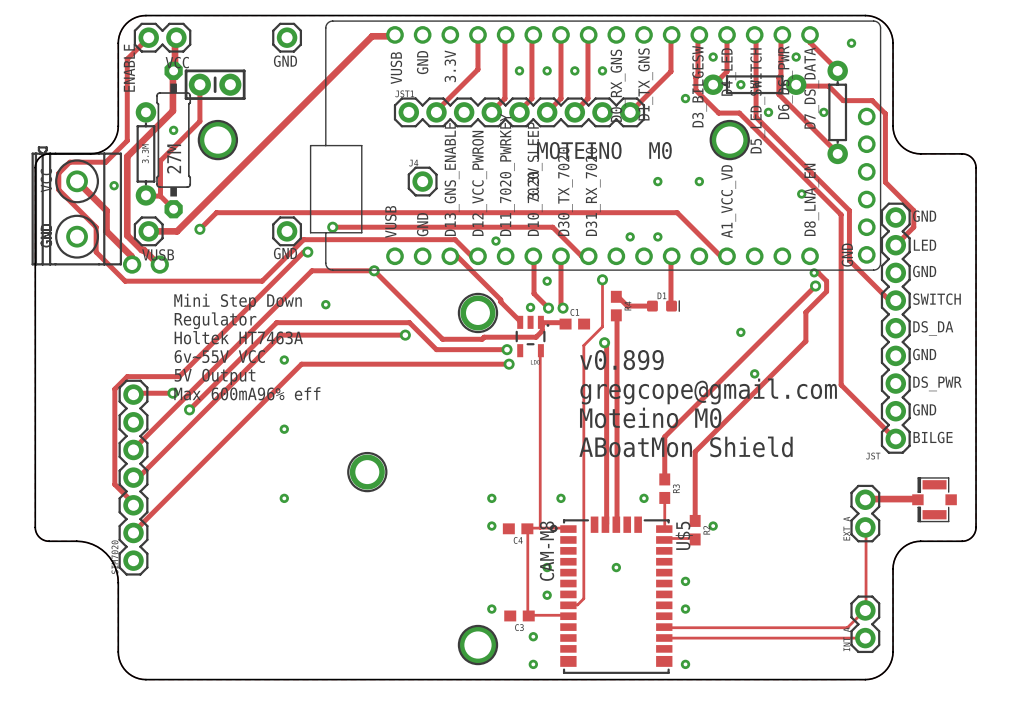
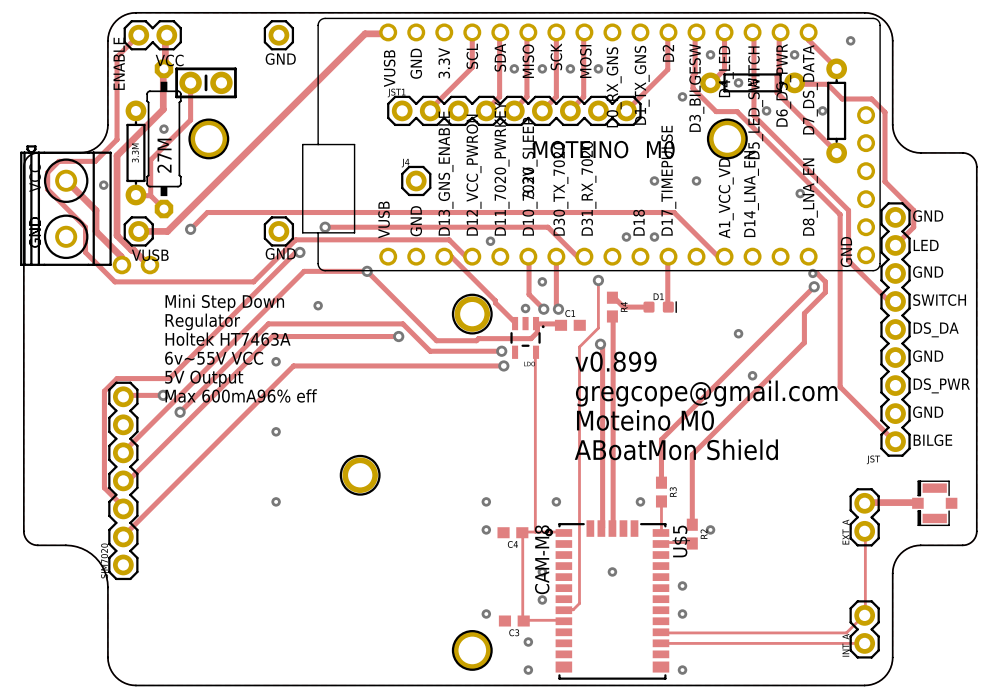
text: none -> D2 (668, 53)
text: none -> SDA (500, 57)
text: none -> SCK (556, 56)
text: none -> SCL (472, 56)
text: none -> MISO (528, 61)
text: none -> MOSI (585, 61)
text: none -> D17_TIMEPULSE (668, 180)
text: none -> D14_LNA_EN (751, 194)
text: none -> D18 (639, 222)

